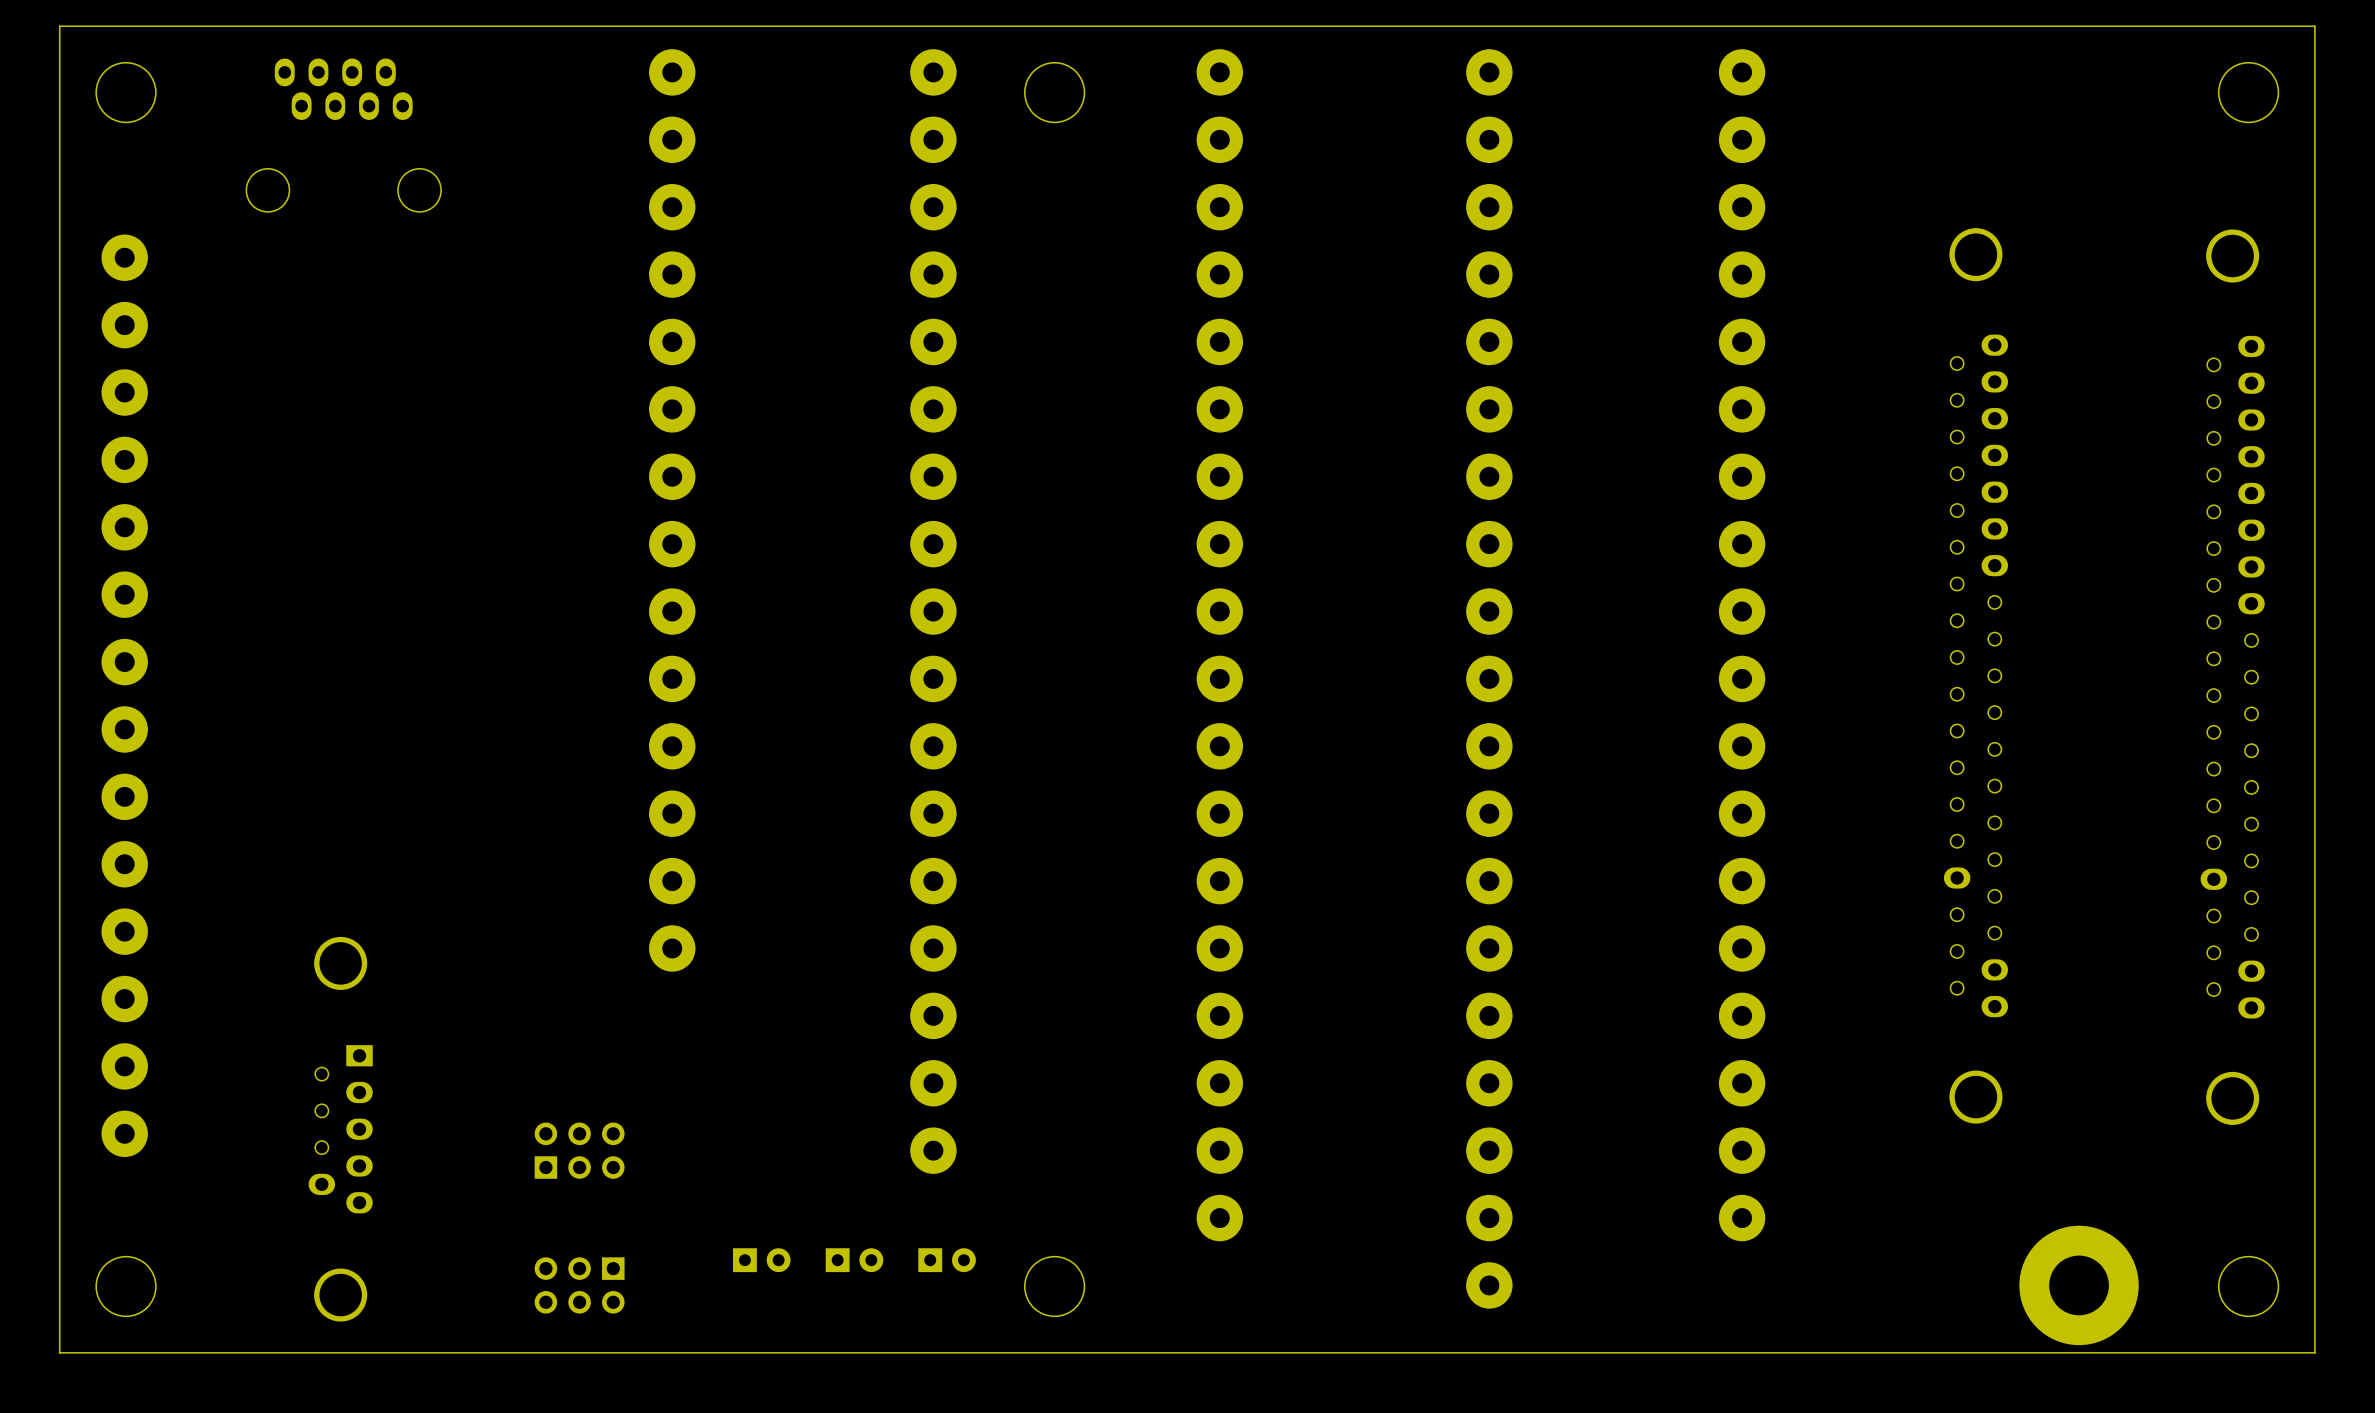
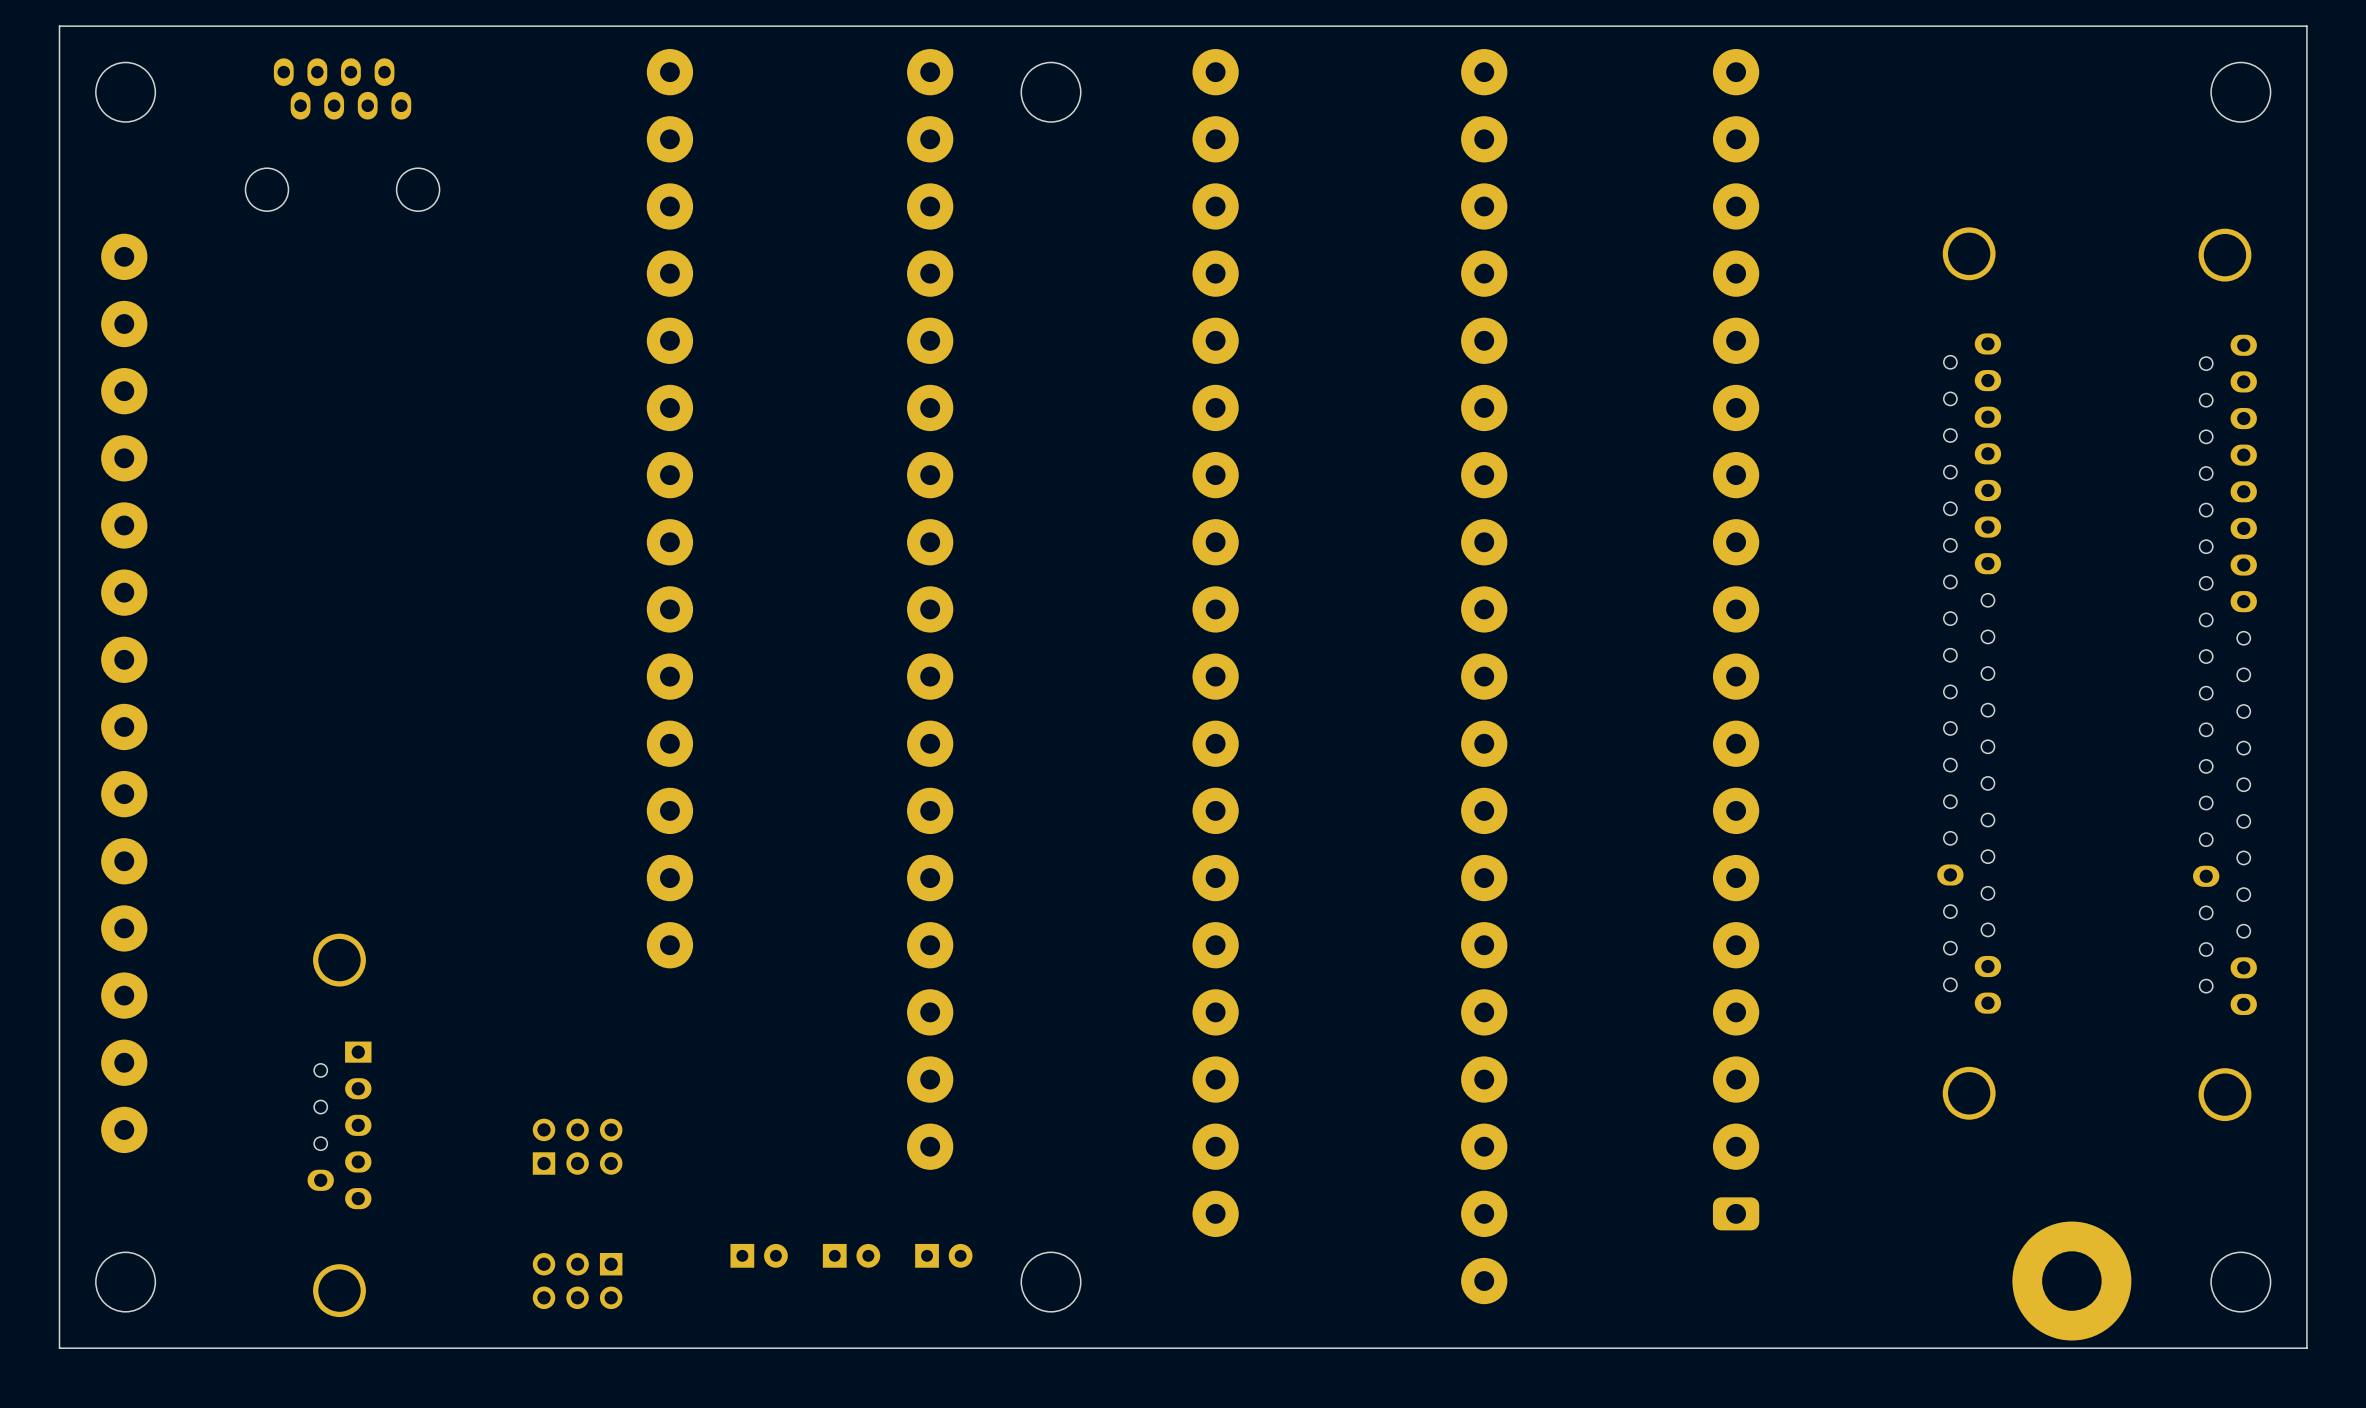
part footprint: [1718, 1127, 1766, 1242] -> [1712, 1123, 1760, 1231]

